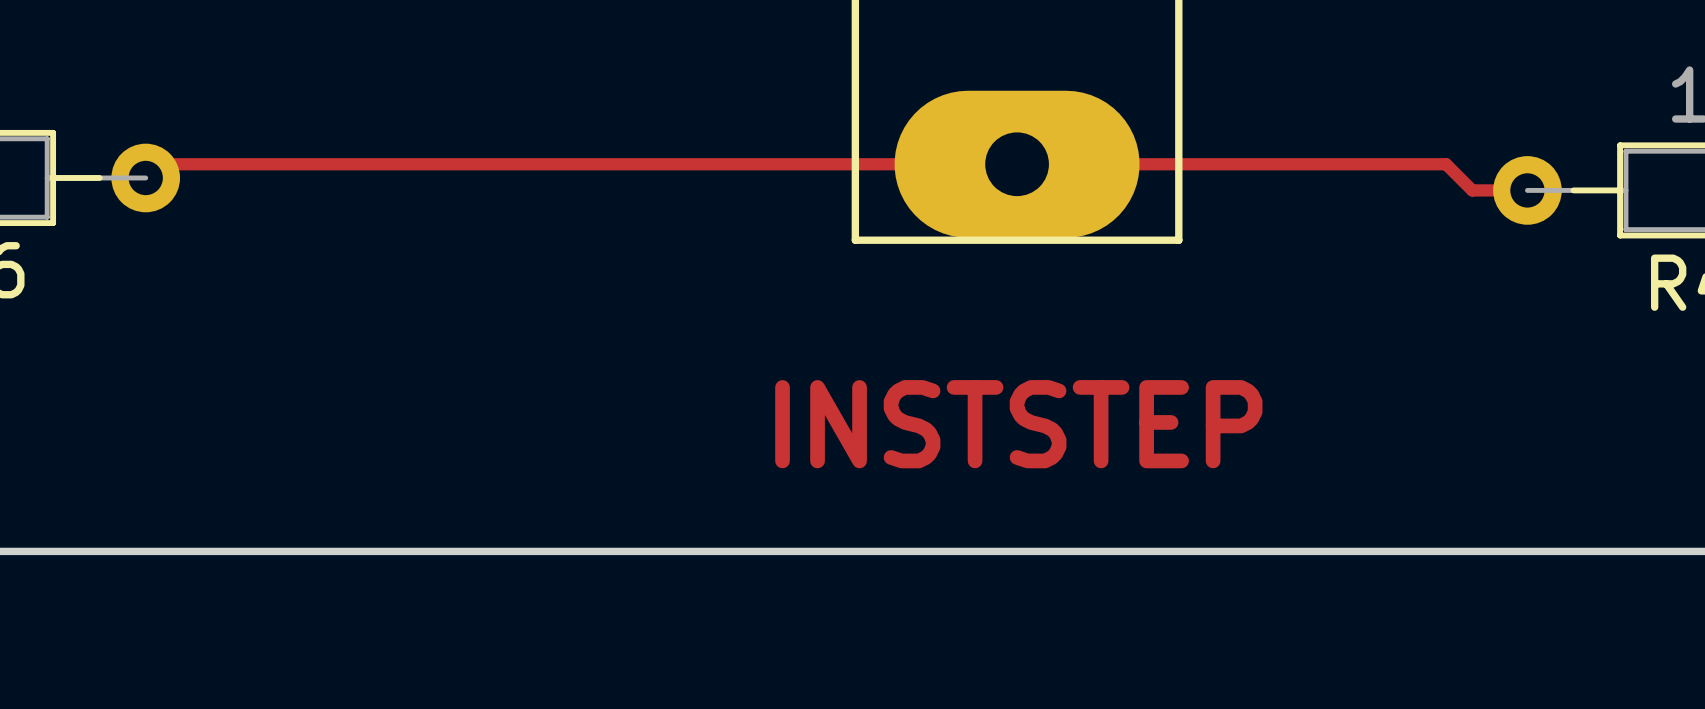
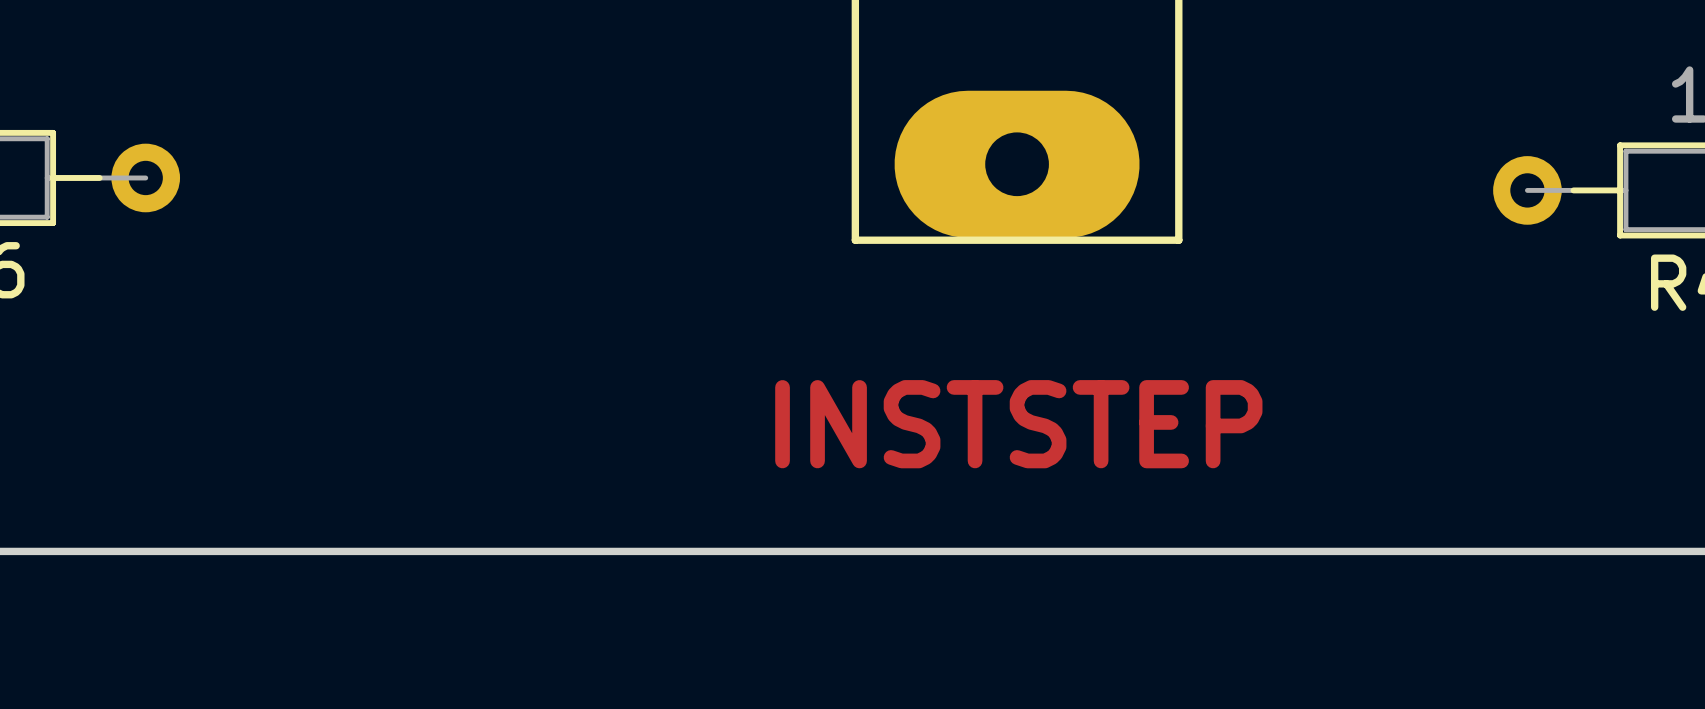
track: (145, 177) (159, 164) (1446, 164) (1472, 190) (1527, 190) -> none

